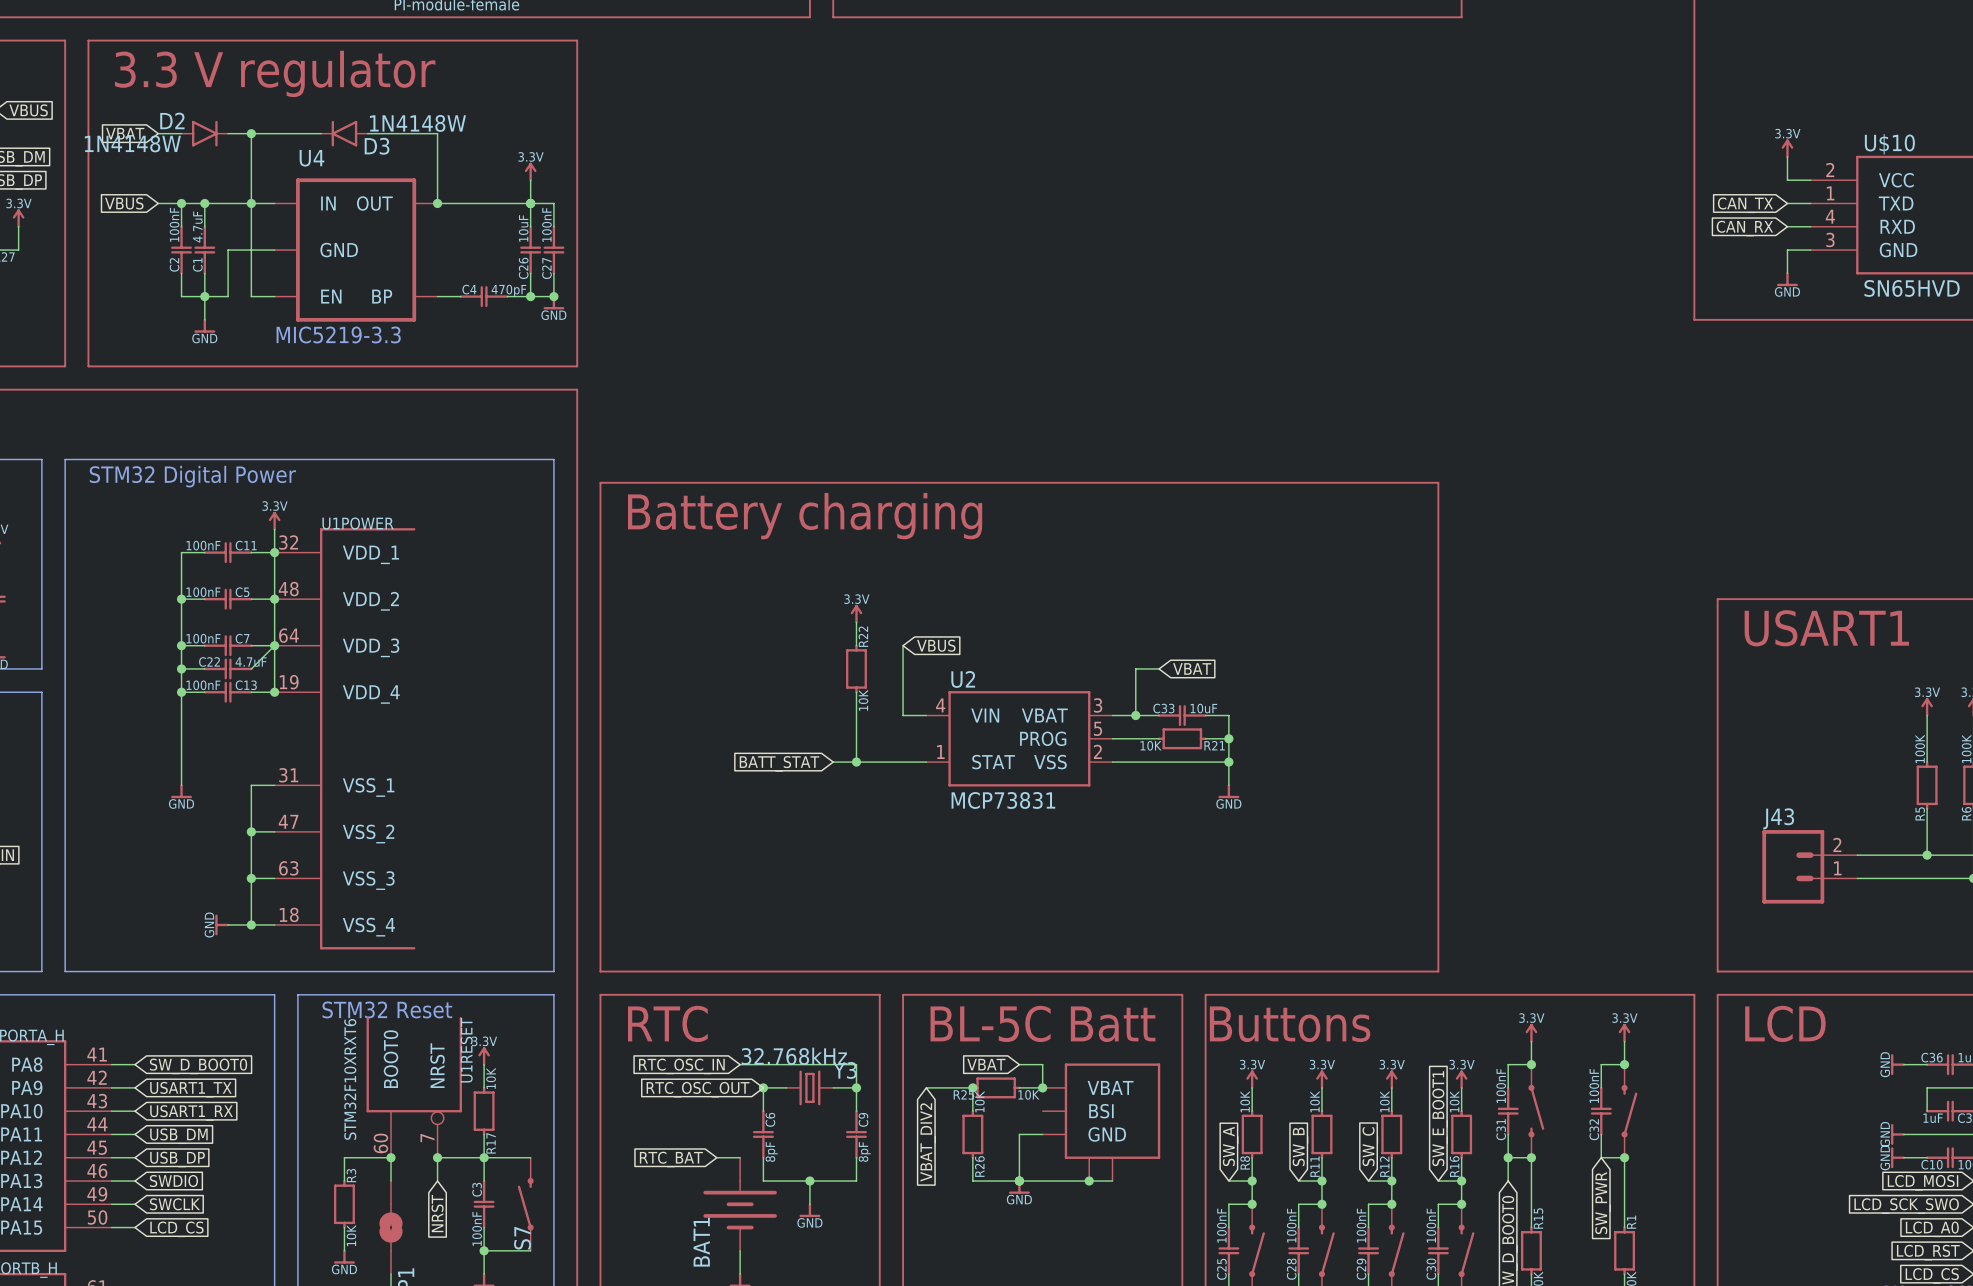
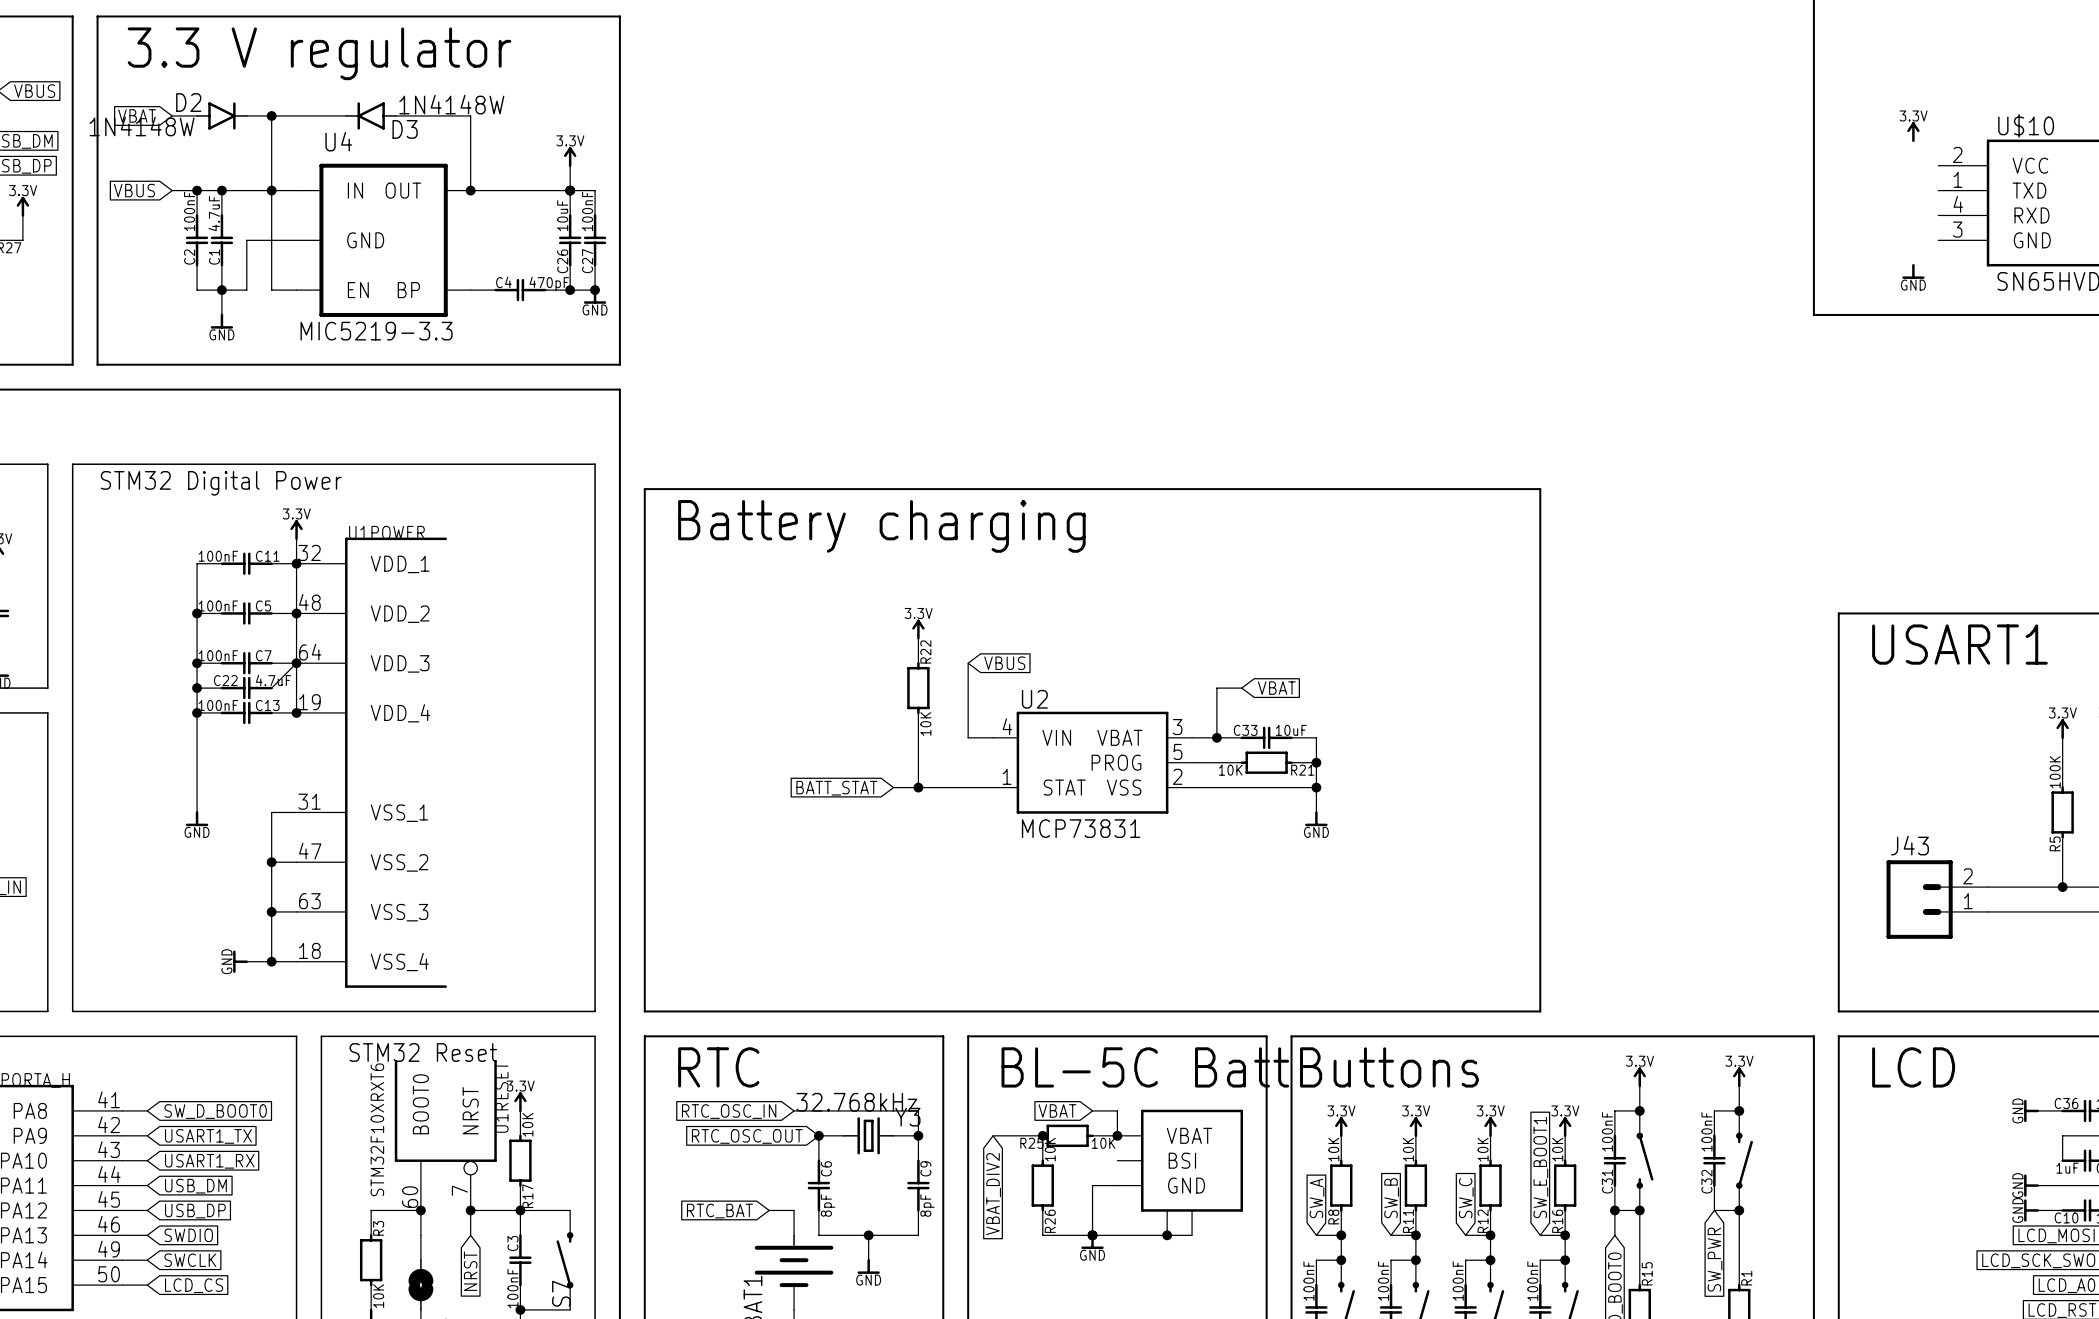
wire: (1787, 156) (1787, 180) (1810, 180) -> none
wire: (1787, 203) (1810, 203) -> none
global label: CAN_TX (1745, 205) -> none
wire: (1787, 226) (1810, 226) -> none
global label: CAN_RX (1744, 228) -> none
wire: (1810, 250) (1787, 250) (1787, 273) -> none

